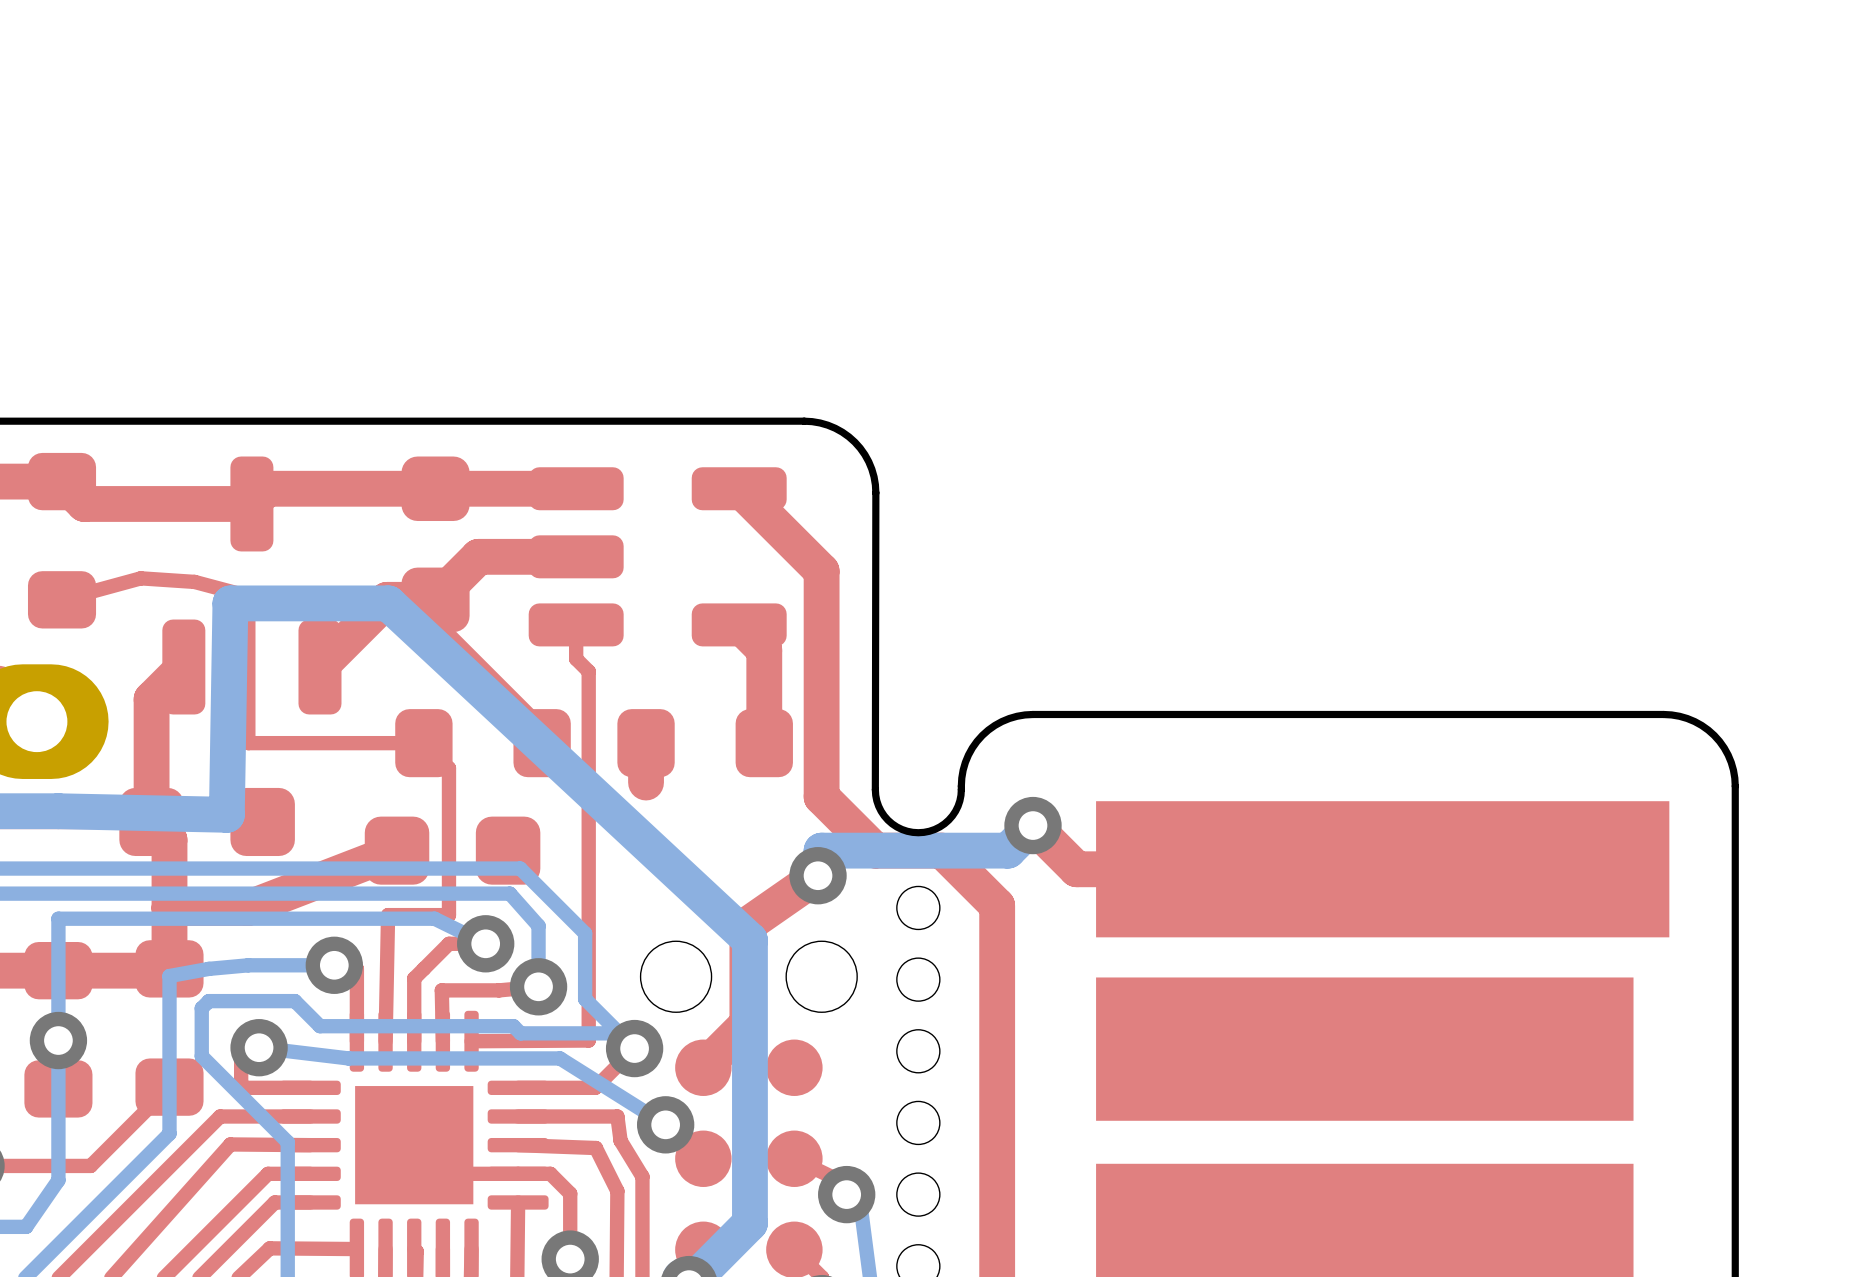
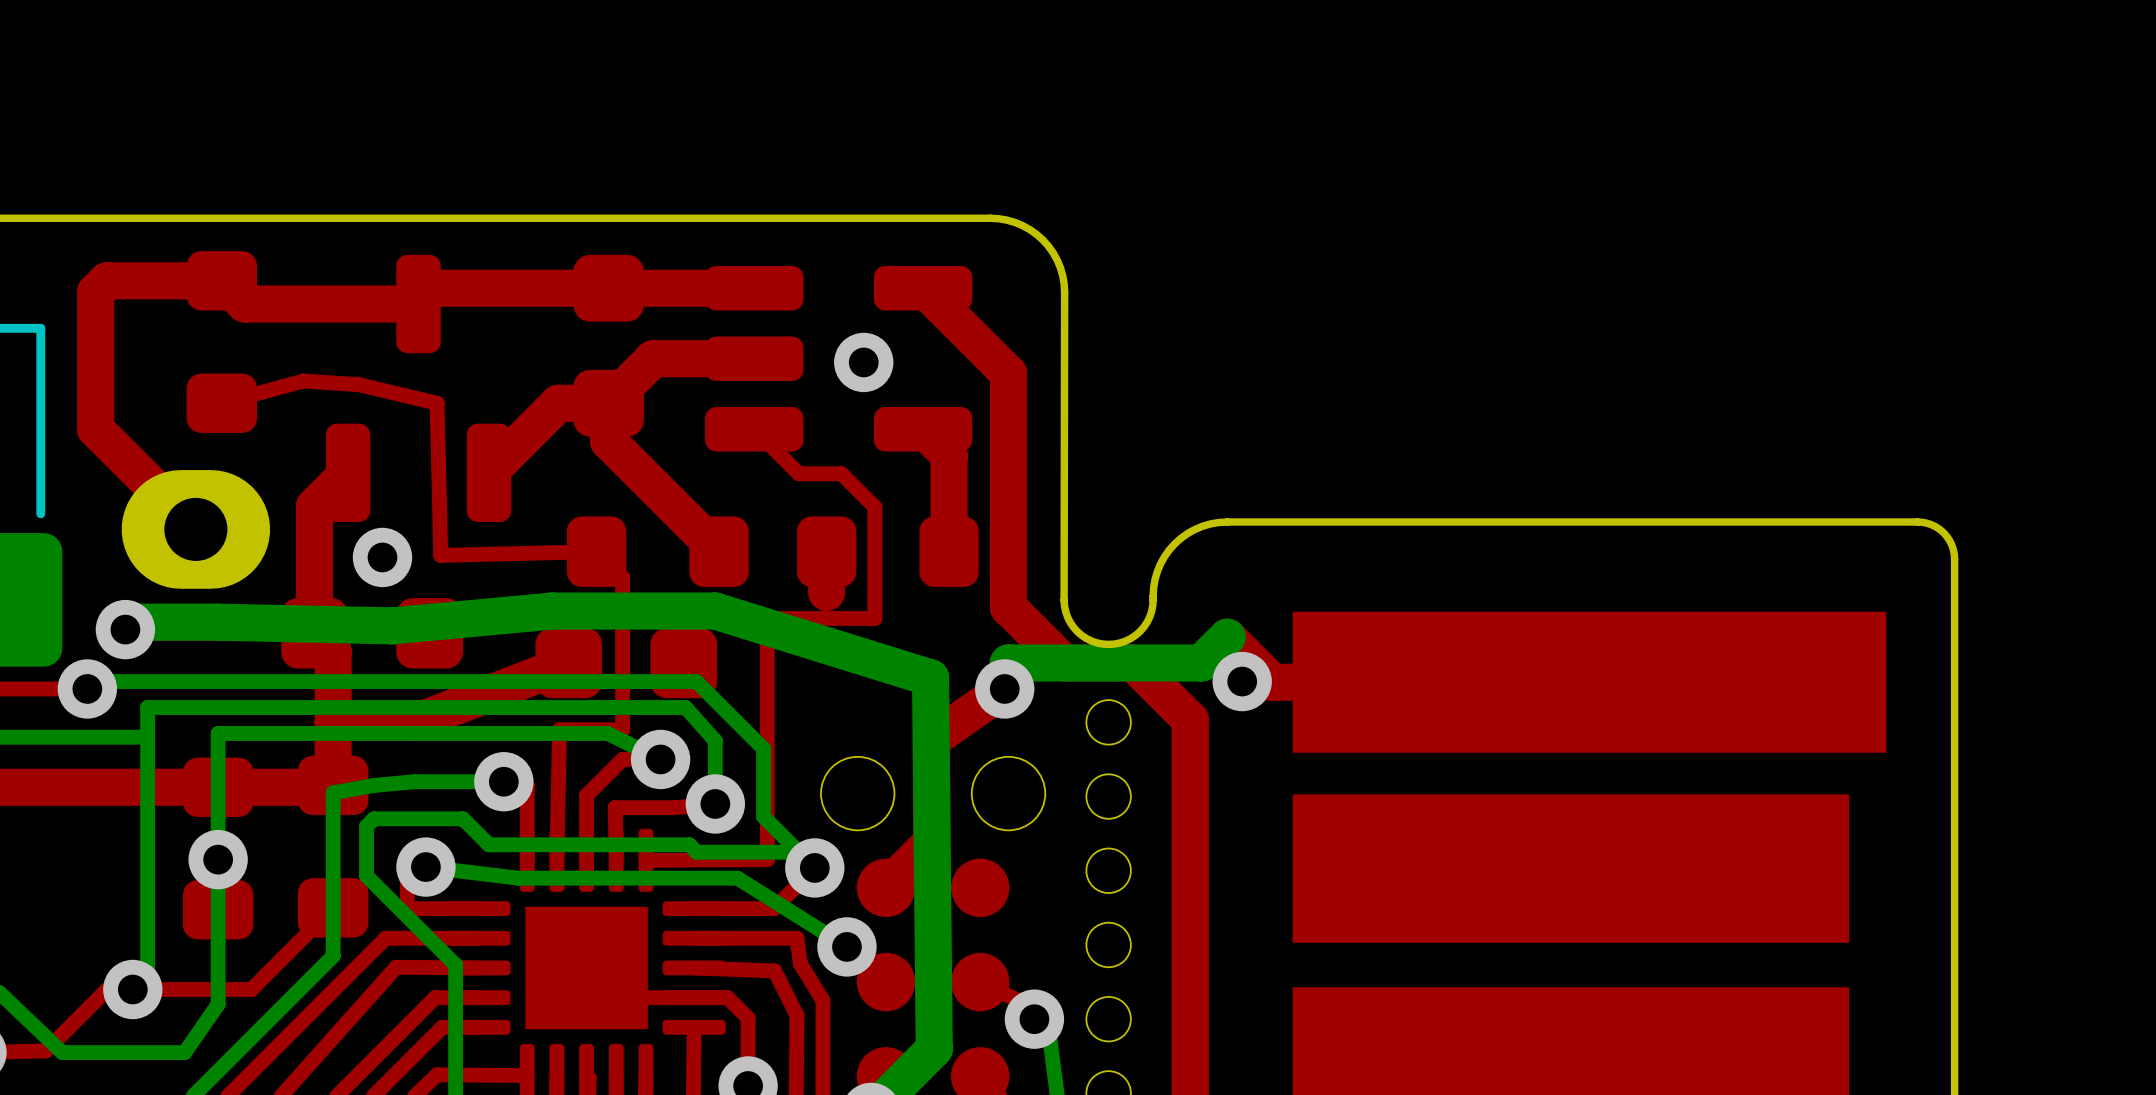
via: none -> (863, 362)
top track: (194, 581) (248, 596) (248, 743) (423, 743) -> (359, 384) (437, 403) (440, 555) (596, 551)
top track: (576, 624) (576, 658) (588, 671) (588, 807) -> (754, 429) (798, 473) (841, 473) (874, 507) (874, 618) (767, 618)
board edge: (1663, 714) (1679, 716) (1694, 721) (1714, 735) (1724, 748) (1731, 762) (1735, 786) -> (1880, 521) (1922, 522) (1931, 524) (1943, 532) (1951, 544) (1954, 554) (1954, 596)
via: none -> (382, 557)
bottom track: (226, 814) (230, 603) (388, 603) (749, 940) (749, 1223) -> (392, 625) (552, 611) (715, 611) (930, 677) (934, 1048)
via position: (1033, 825) -> (1242, 681)

